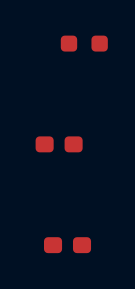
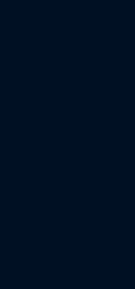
part: (84, 43) -> none
part: (59, 144) -> none
part: (67, 245) -> none

